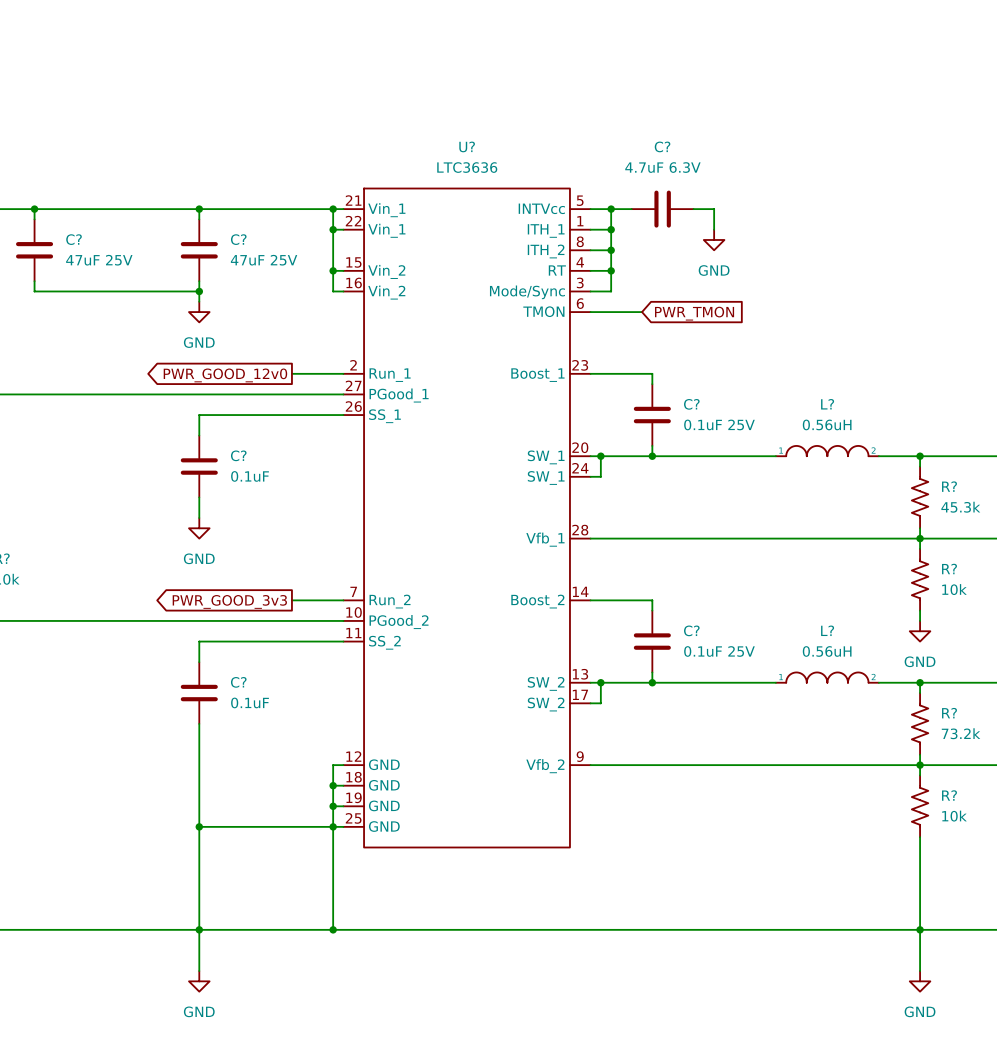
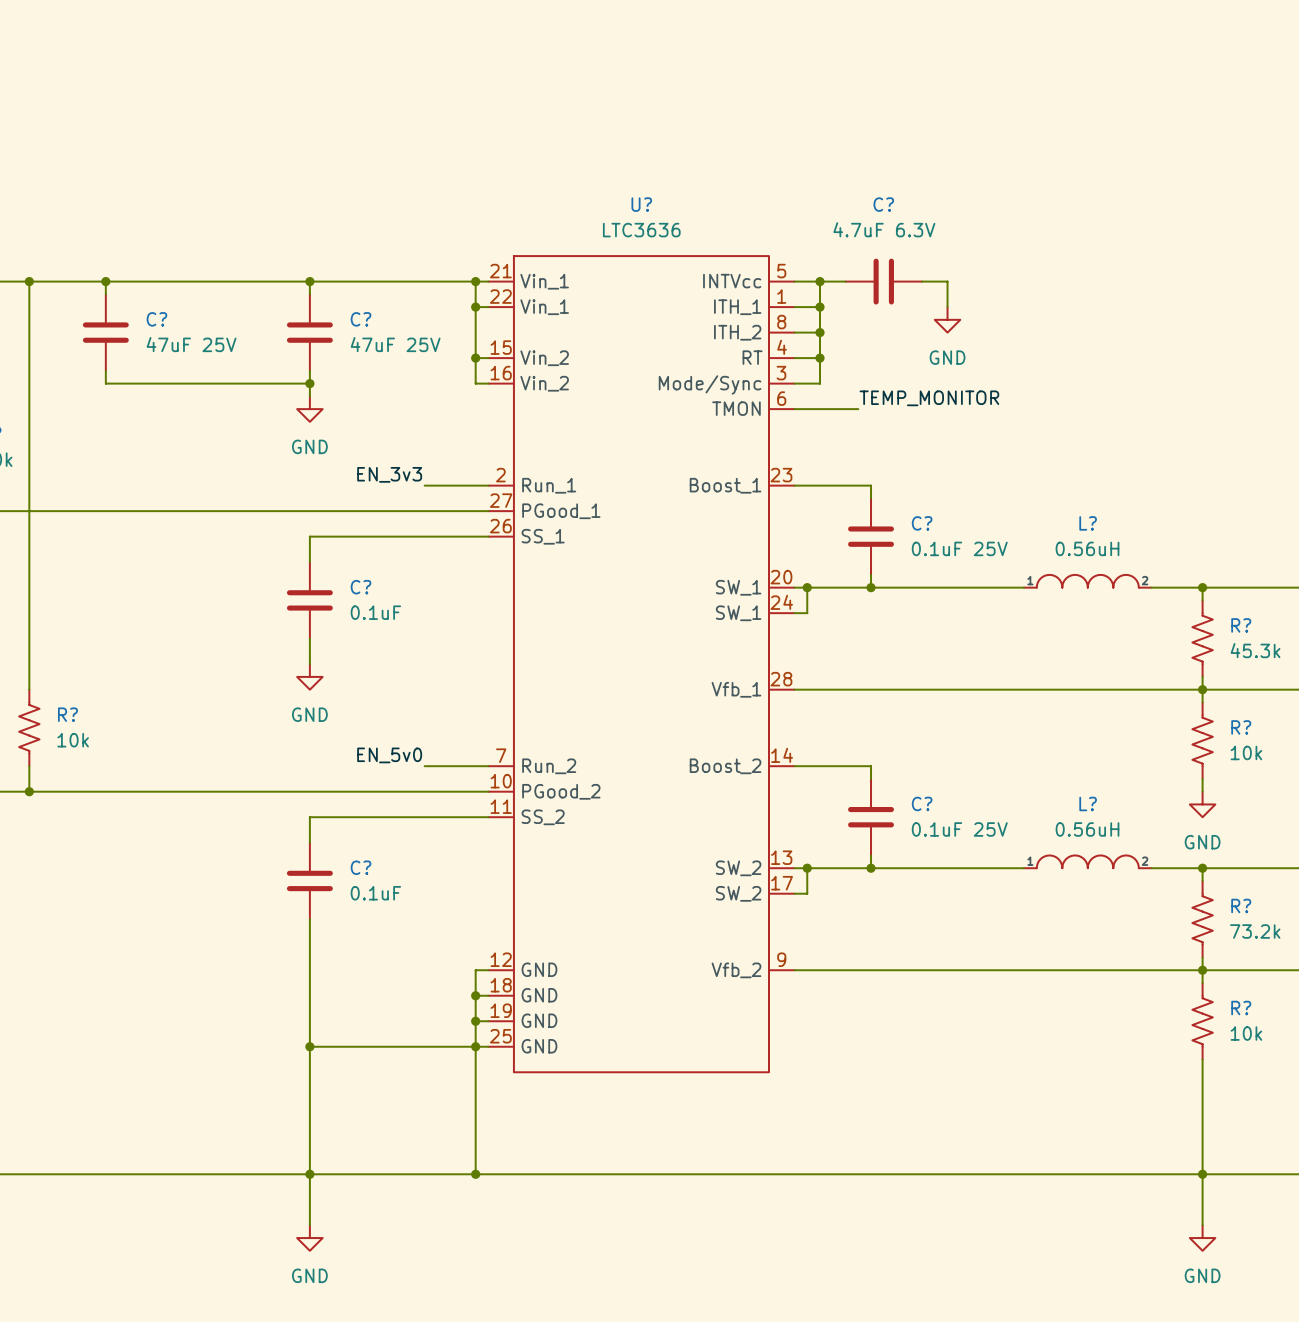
label: none -> TEMP_MONITOR (929, 398)
global label: PWR_TMON (694, 313) -> none
label: none -> EN_3v3 (389, 474)
global label: PWR_GOOD_12v0 (225, 375) -> none
label: none -> EN_5v0 (389, 755)
global label: PWR_GOOD_3v3 (229, 601) -> none

